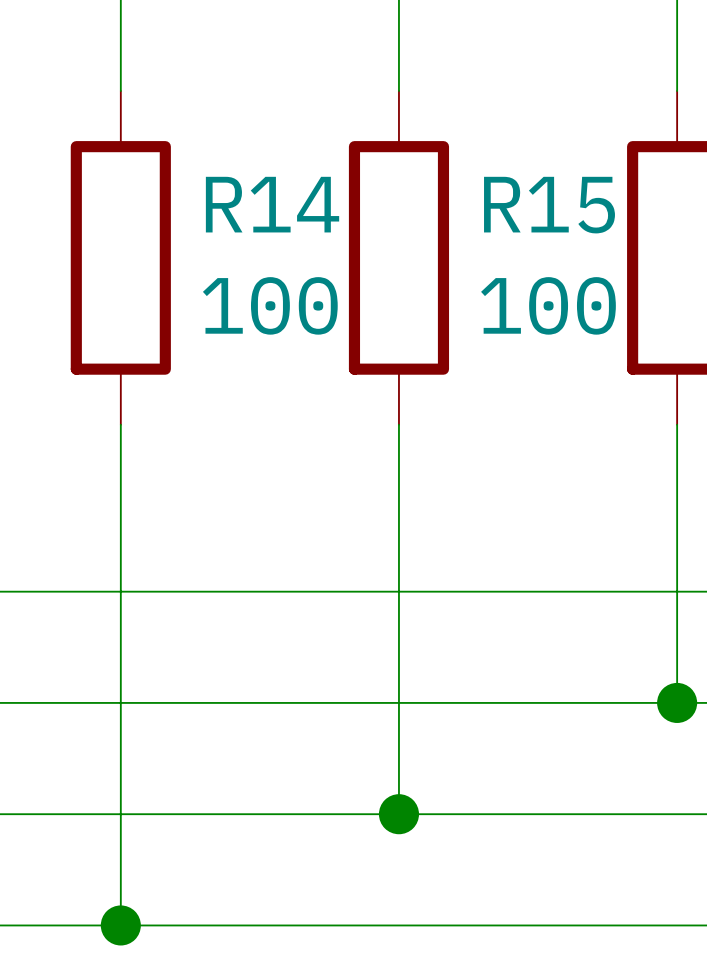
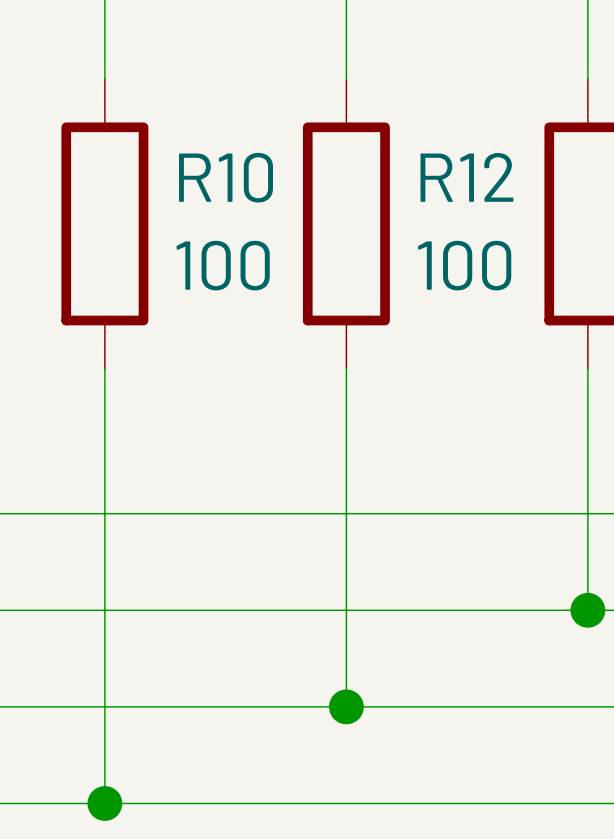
R14 name: R14 (272, 204) -> R10 (225, 177)
R15 name: R15 (549, 205) -> R12 (466, 177)

